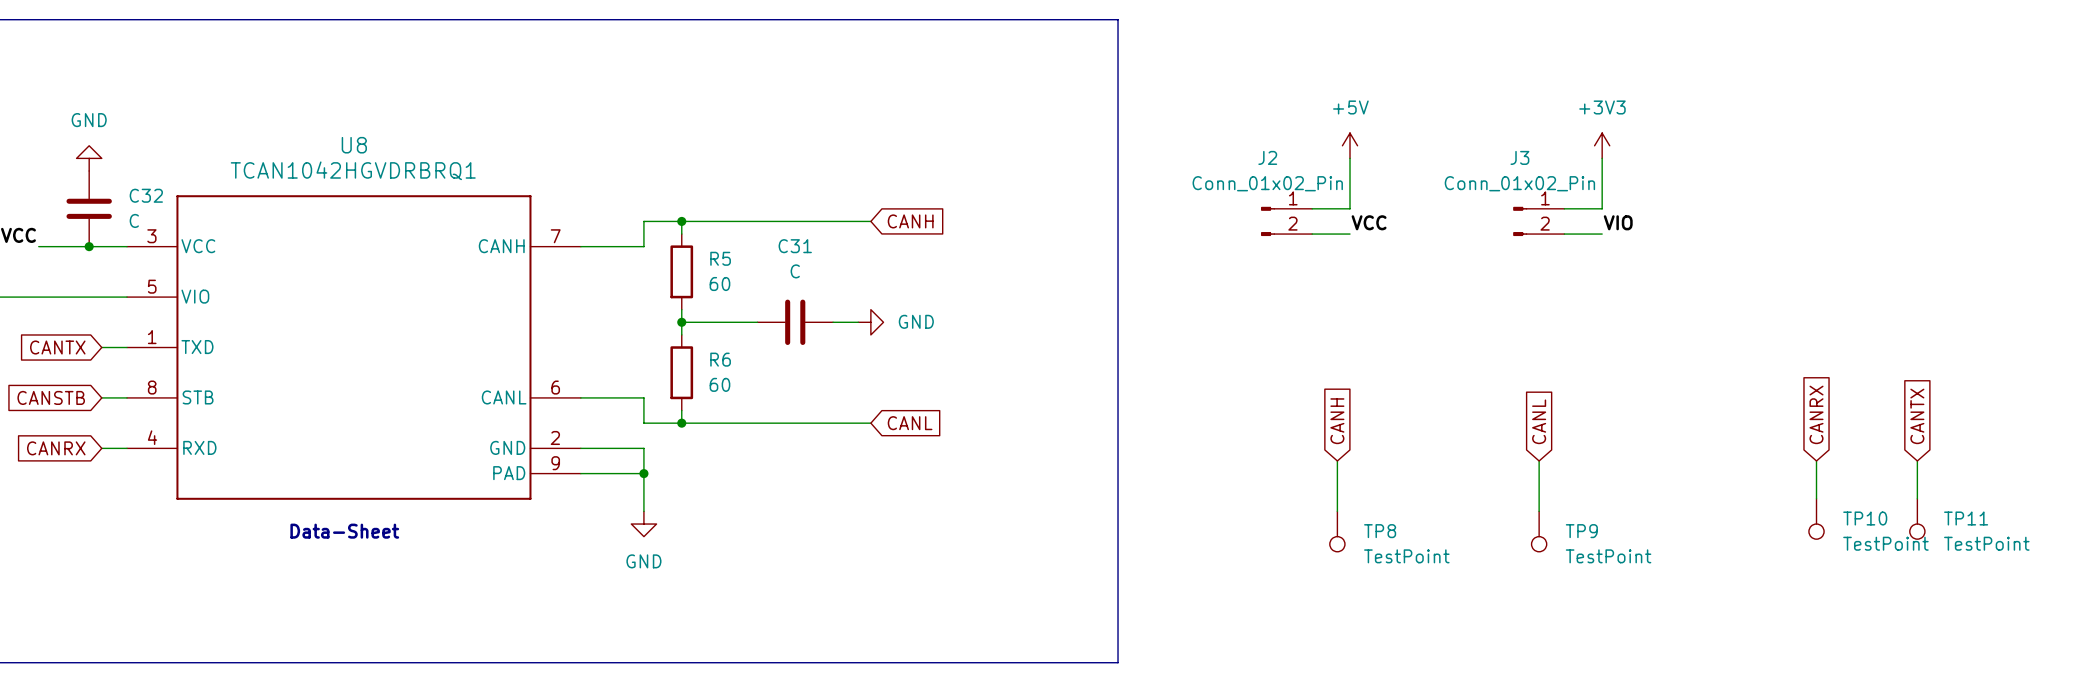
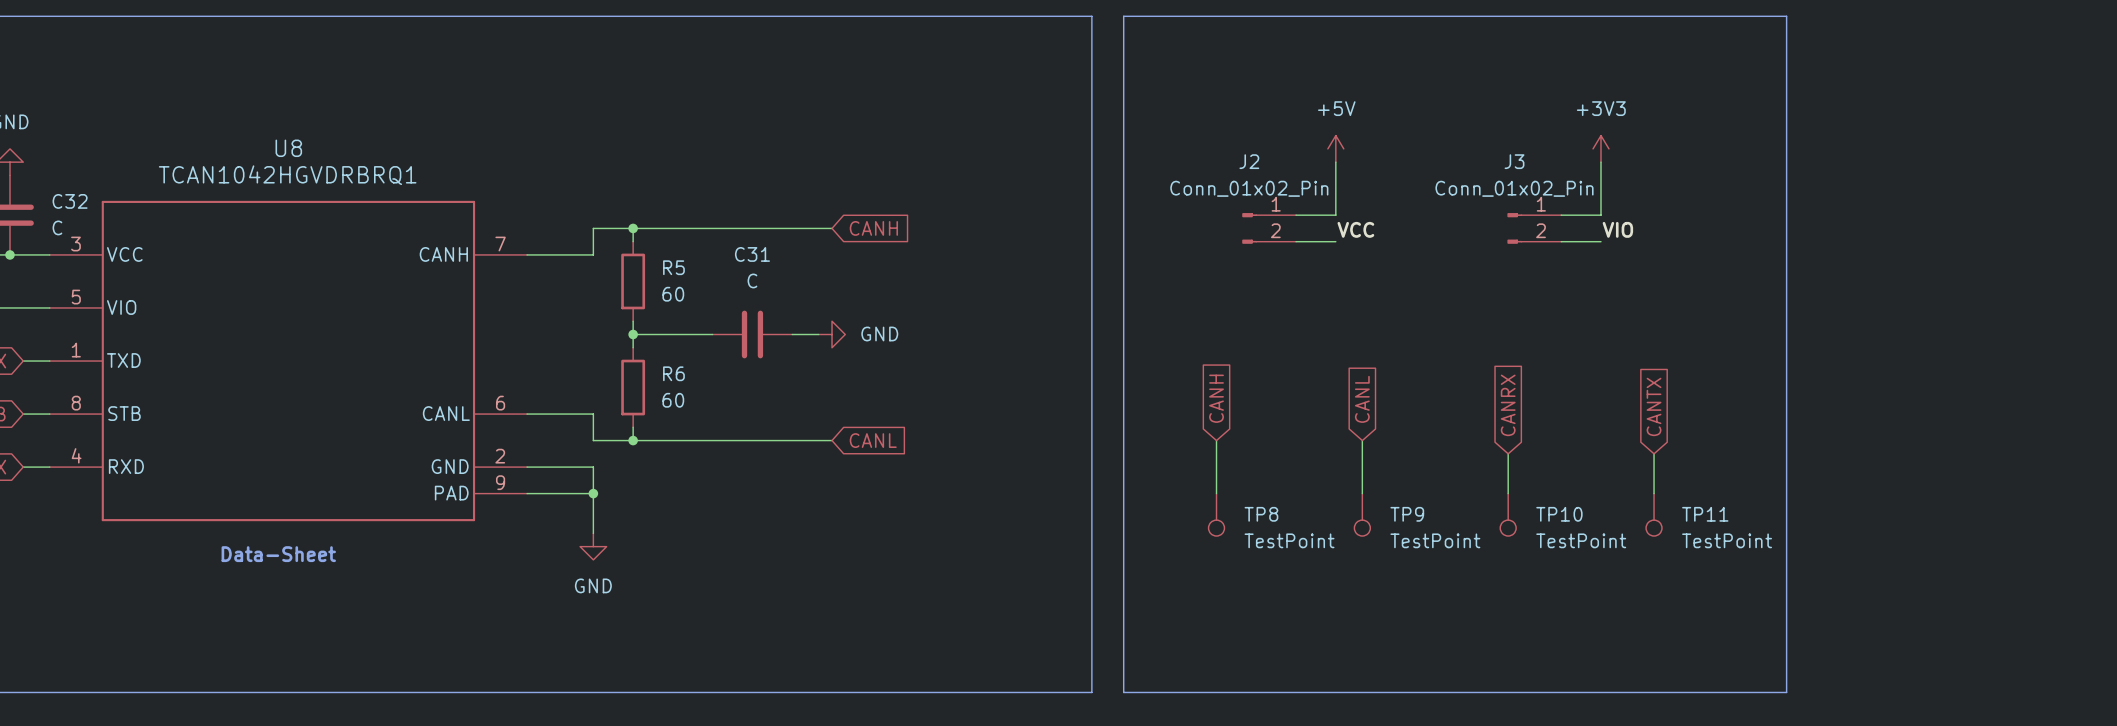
line: none -> (1123, 16) (1786, 16) (1786, 692) (1123, 692) (1123, 16)
global label: none -> CANRX (1508, 405)
global label: none -> CANTX (1654, 406)
global label: CANRX (1816, 414) -> none
global label: CANTX (1917, 416) -> none
global label position: CANH (1337, 421) -> CANH (1216, 398)
global label position: CANL (1539, 421) -> CANL (1362, 399)
wire: none -> (1216, 440) (1216, 493)
wire: none -> (1508, 453) (1508, 493)
wire: (1337, 460) (1337, 511) -> (1362, 440) (1362, 493)
wire: (1539, 460) (1539, 511) -> none
wire: (1816, 460) (1816, 498) -> (1654, 453) (1654, 493)
wire: (1917, 460) (1917, 498) -> none
TP10 position: (1816, 518) -> (1508, 514)
TP11 position: (1917, 518) -> (1654, 514)
TP8 position: (1337, 531) -> (1216, 514)
TP9 position: (1539, 531) -> (1362, 514)

